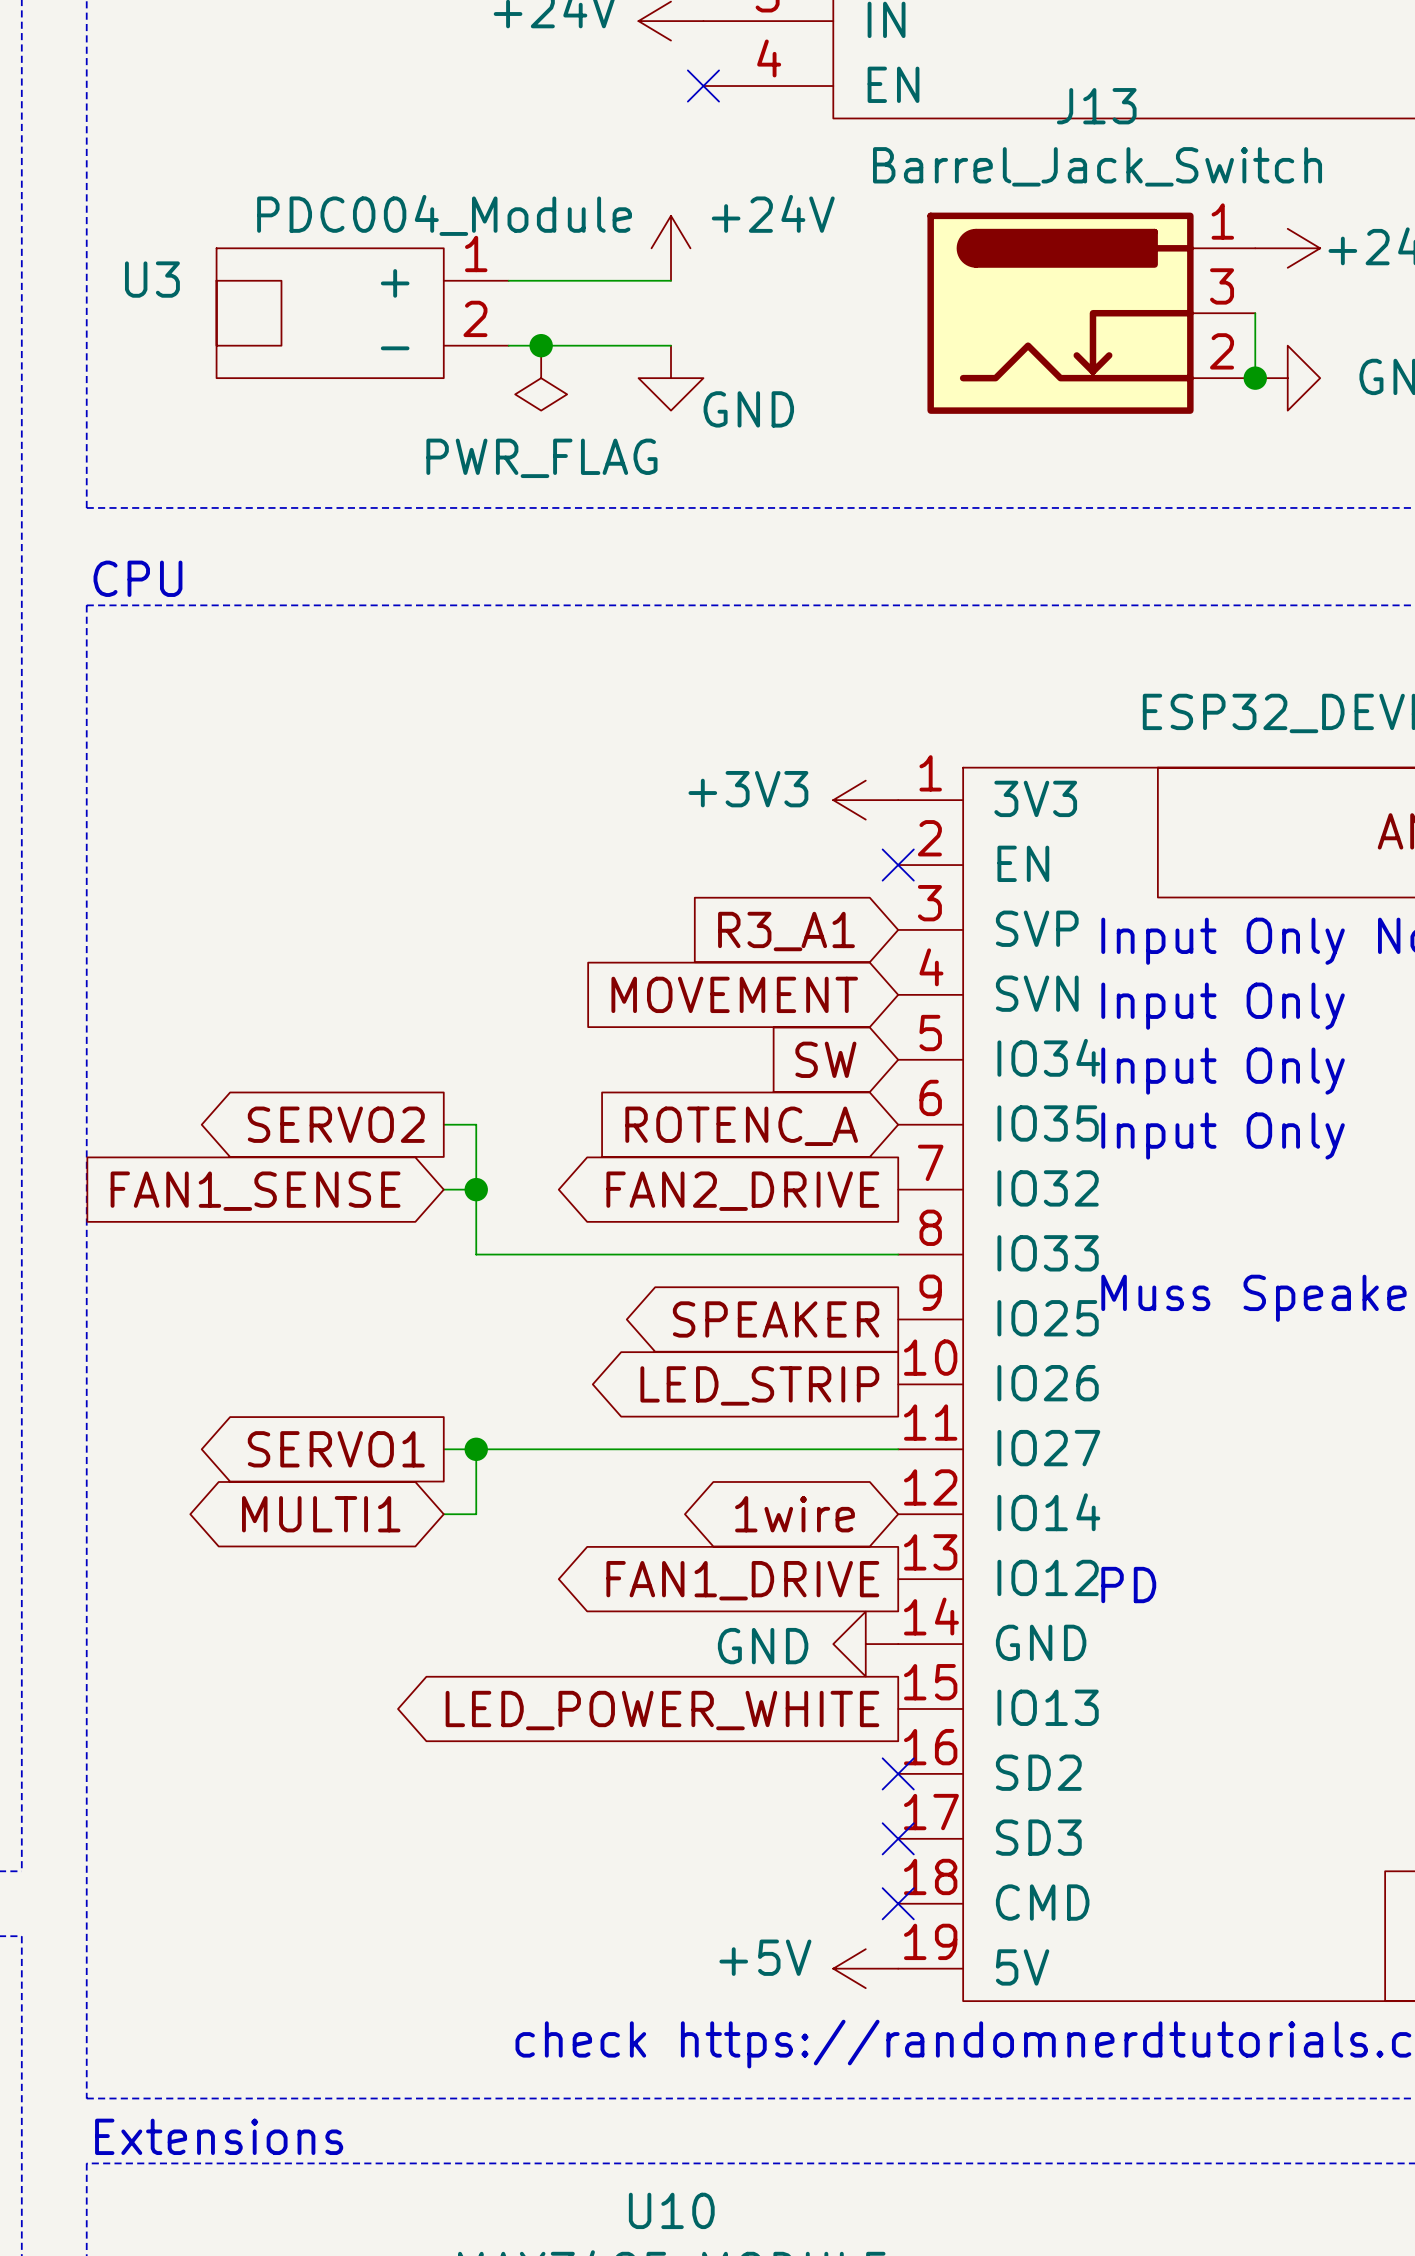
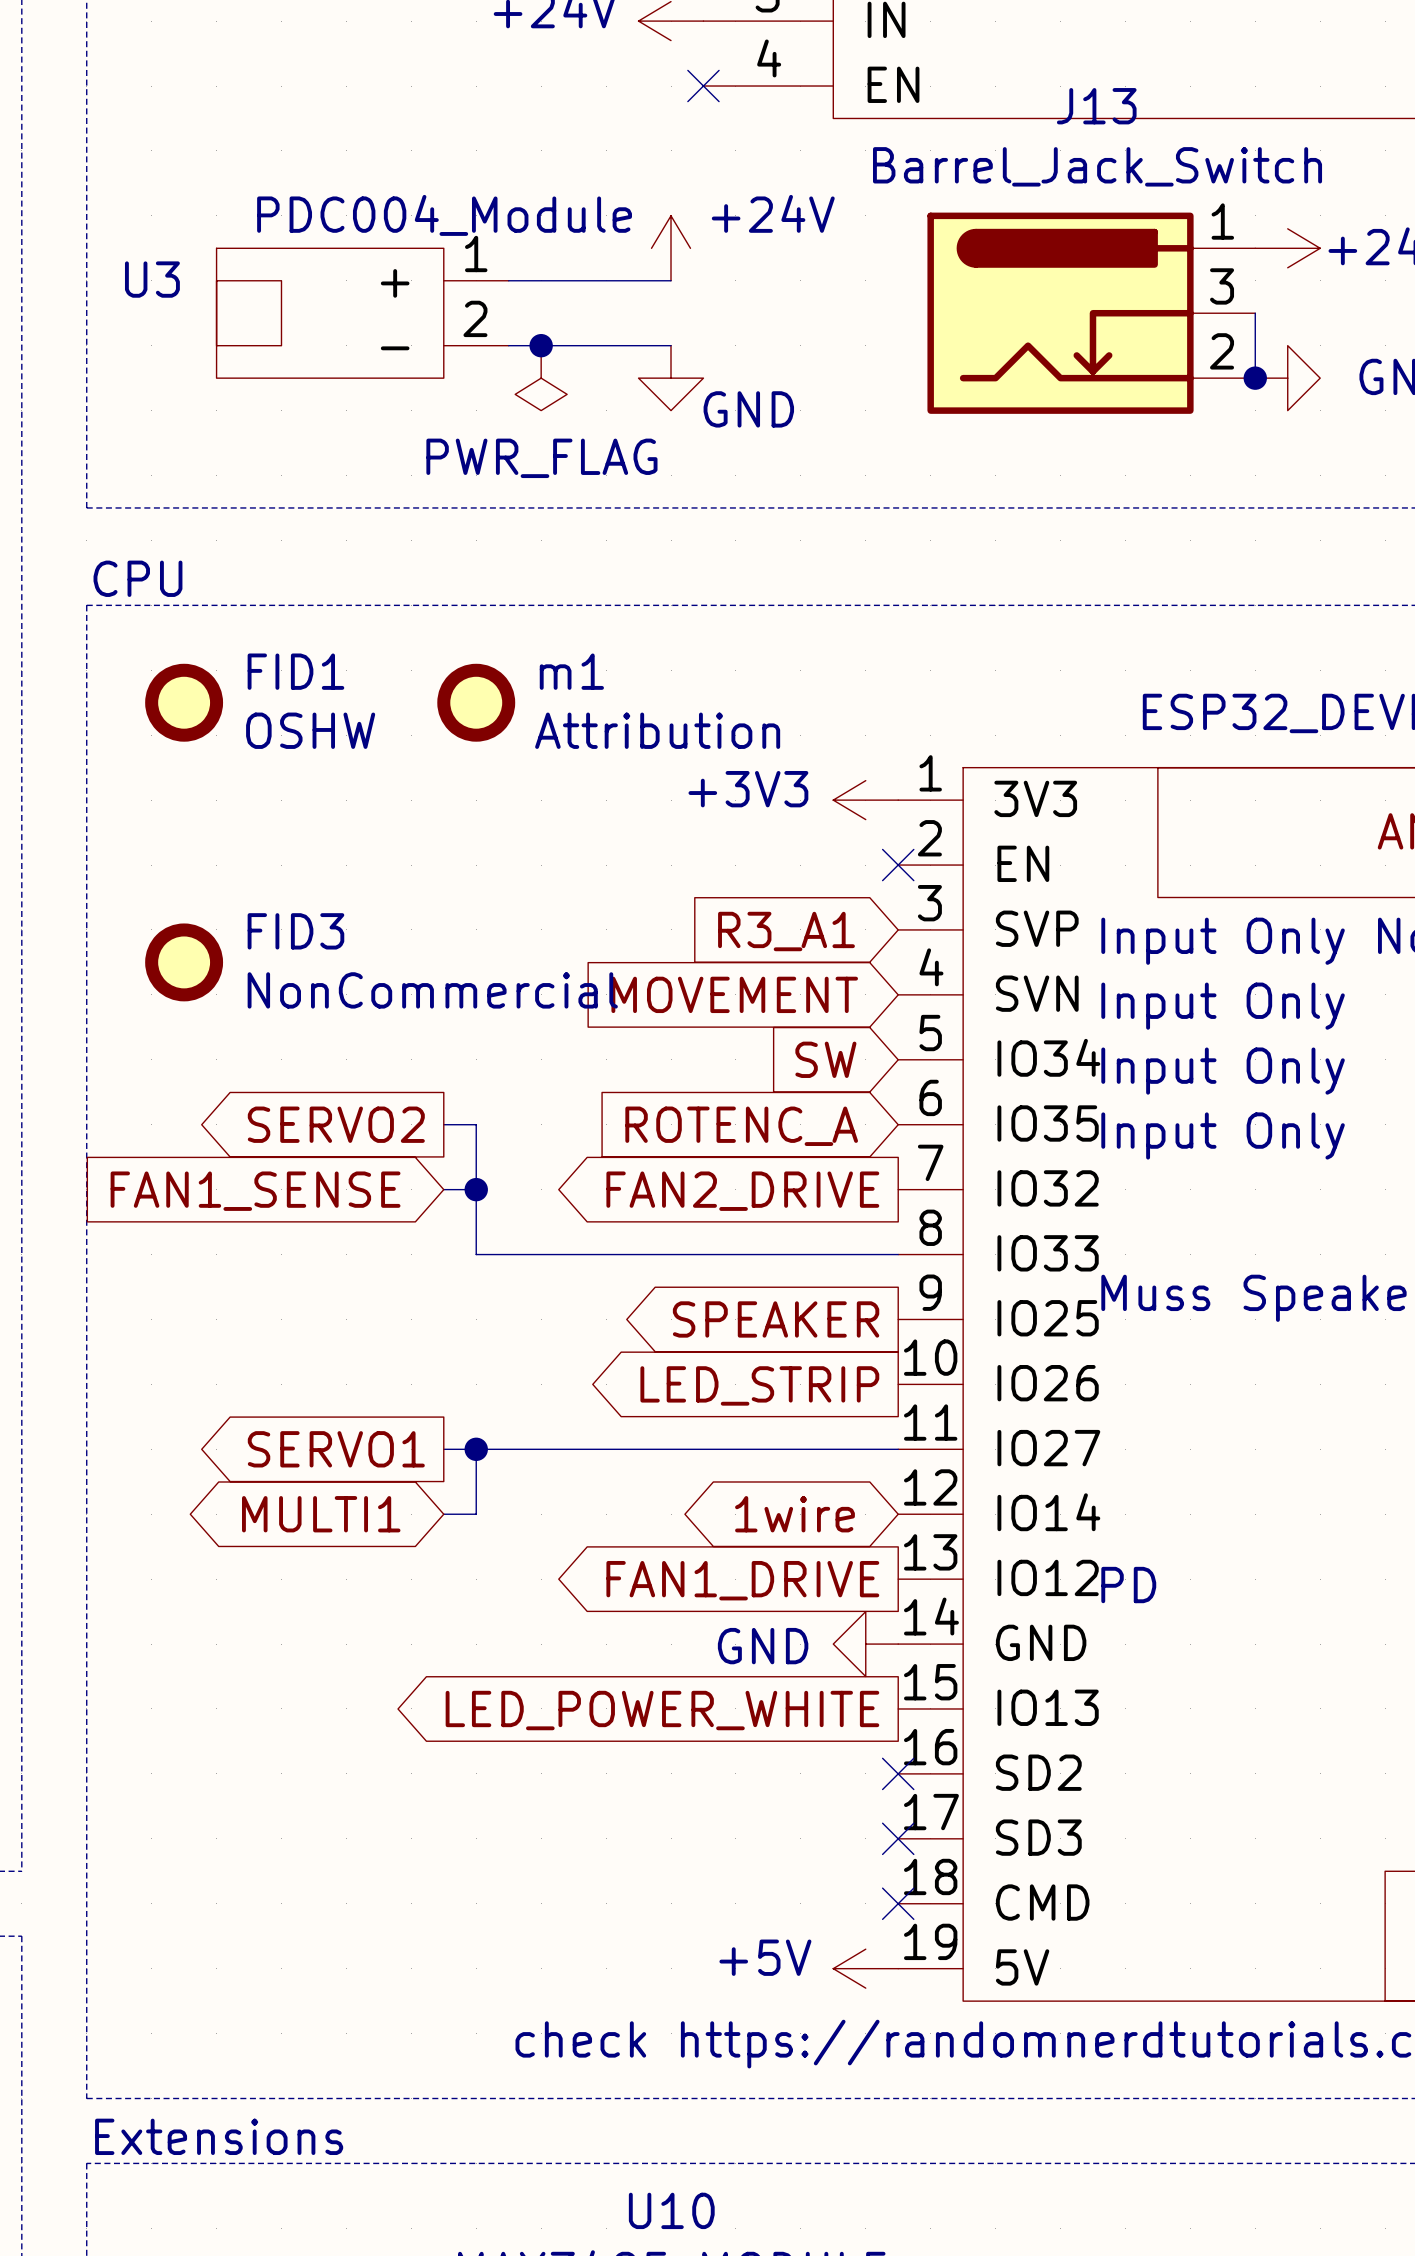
FID1: none -> OSHW (184, 702)
m1: none -> Attribution (476, 702)
FID3: none -> NonCommercial (184, 962)

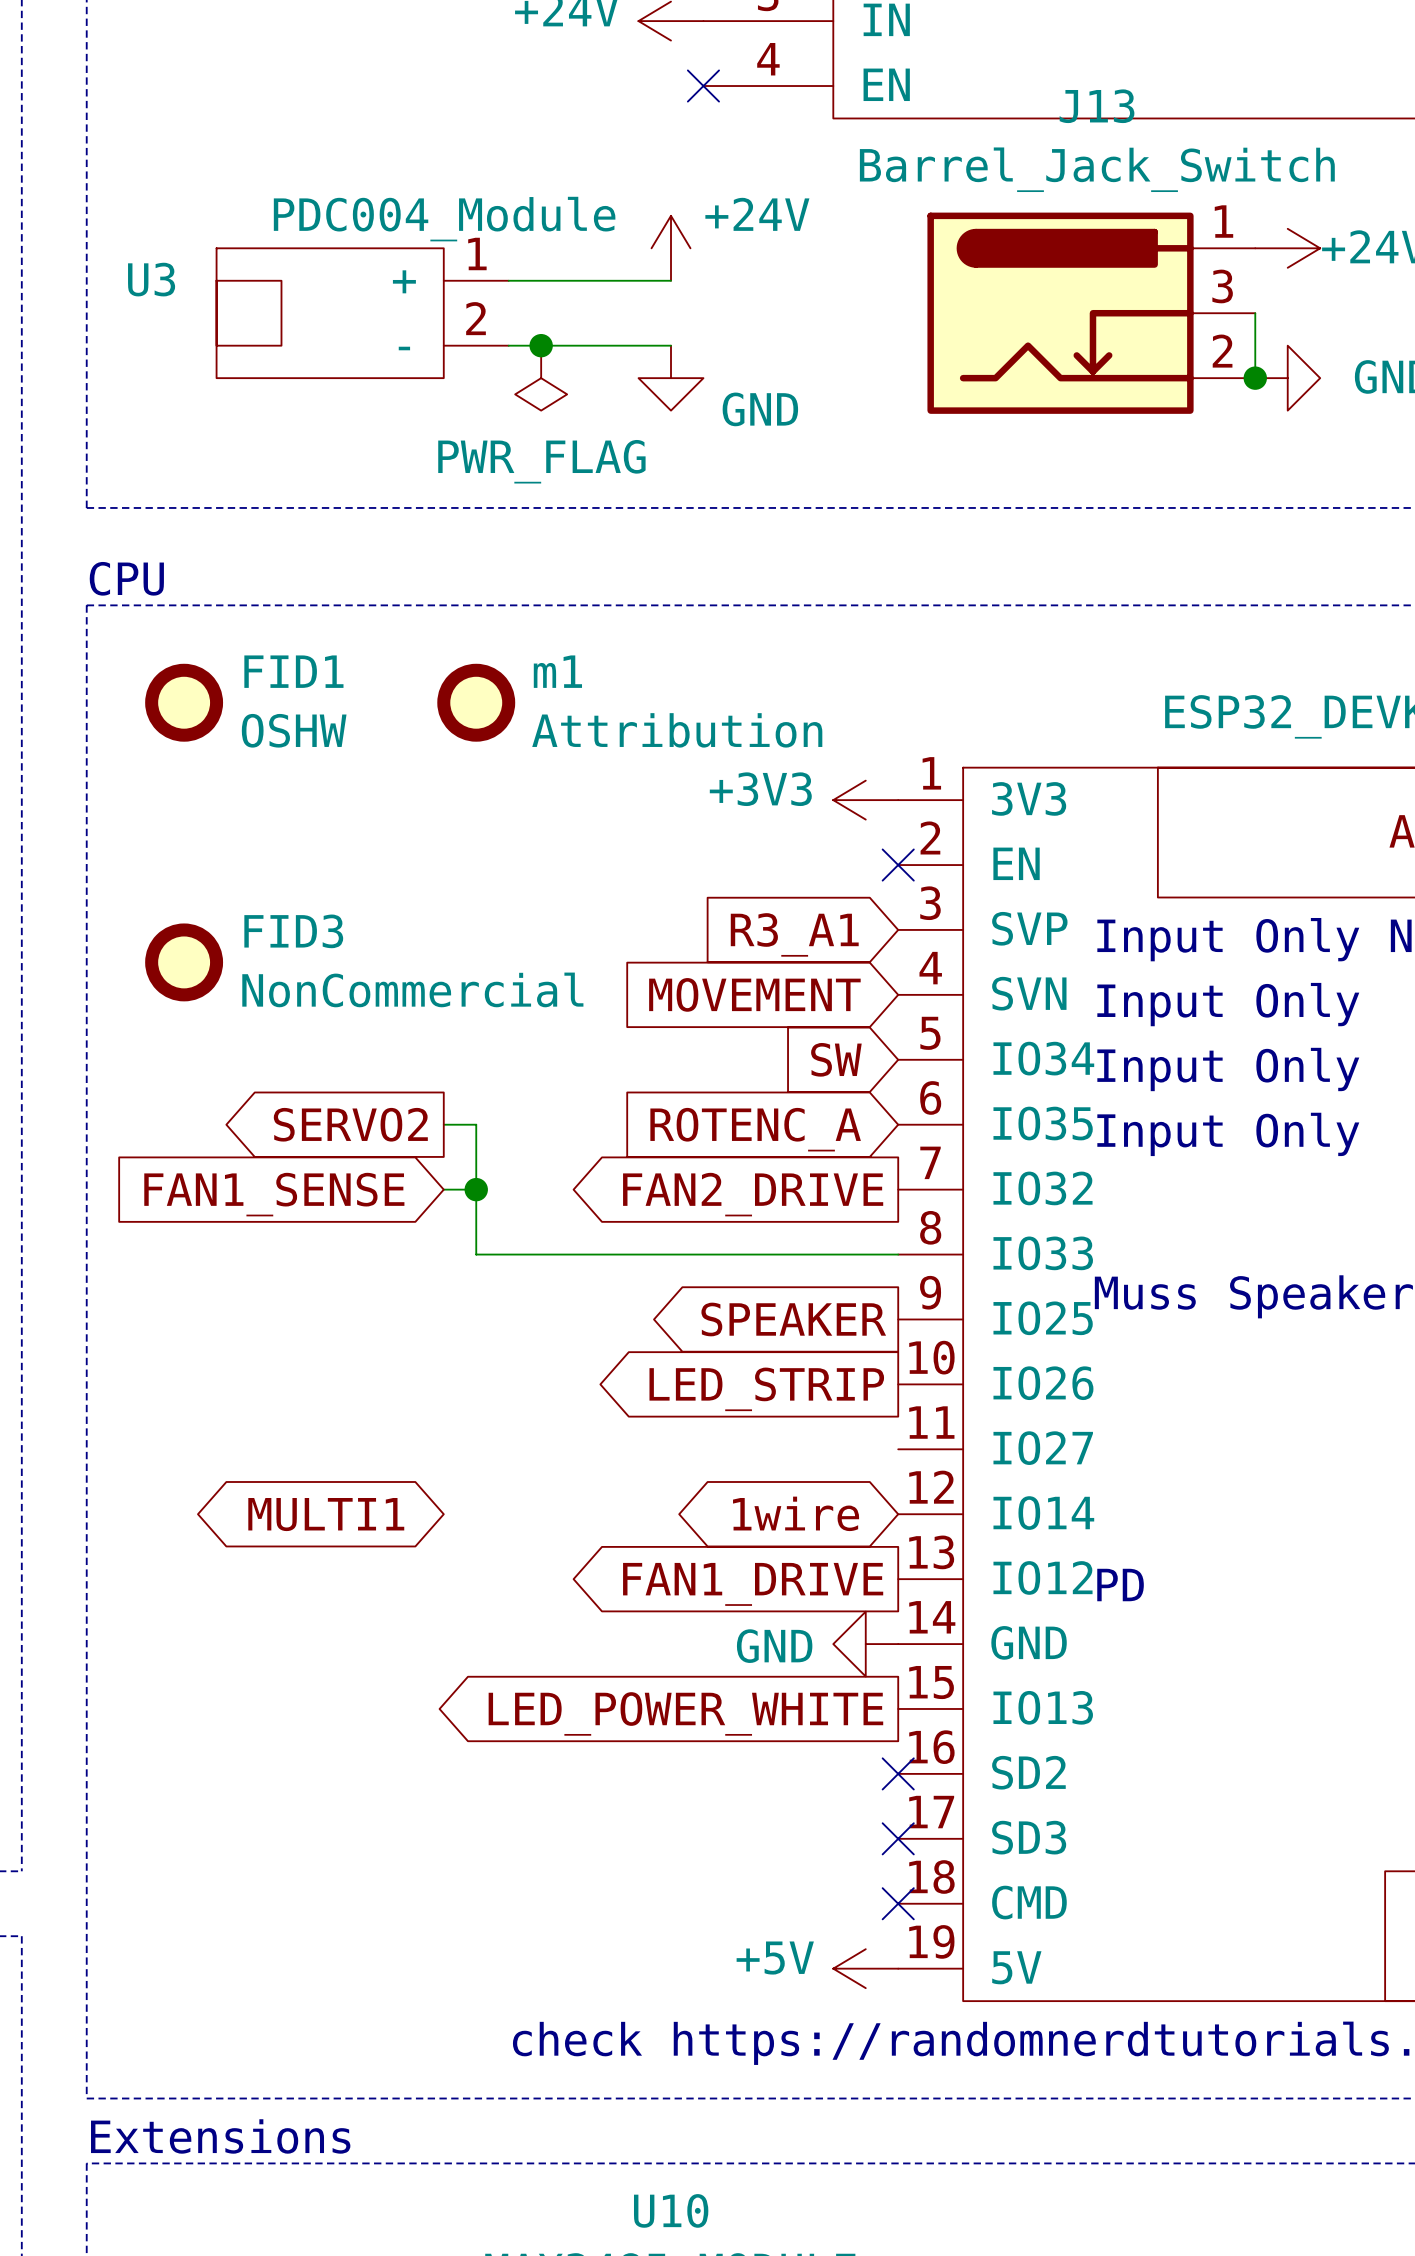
global label: SERVO1 (336, 1449) -> none
wire: (443, 1449) (898, 1449) -> none
wire: (476, 1449) (476, 1514) (443, 1514) -> none
junction: (476, 1449) -> none

